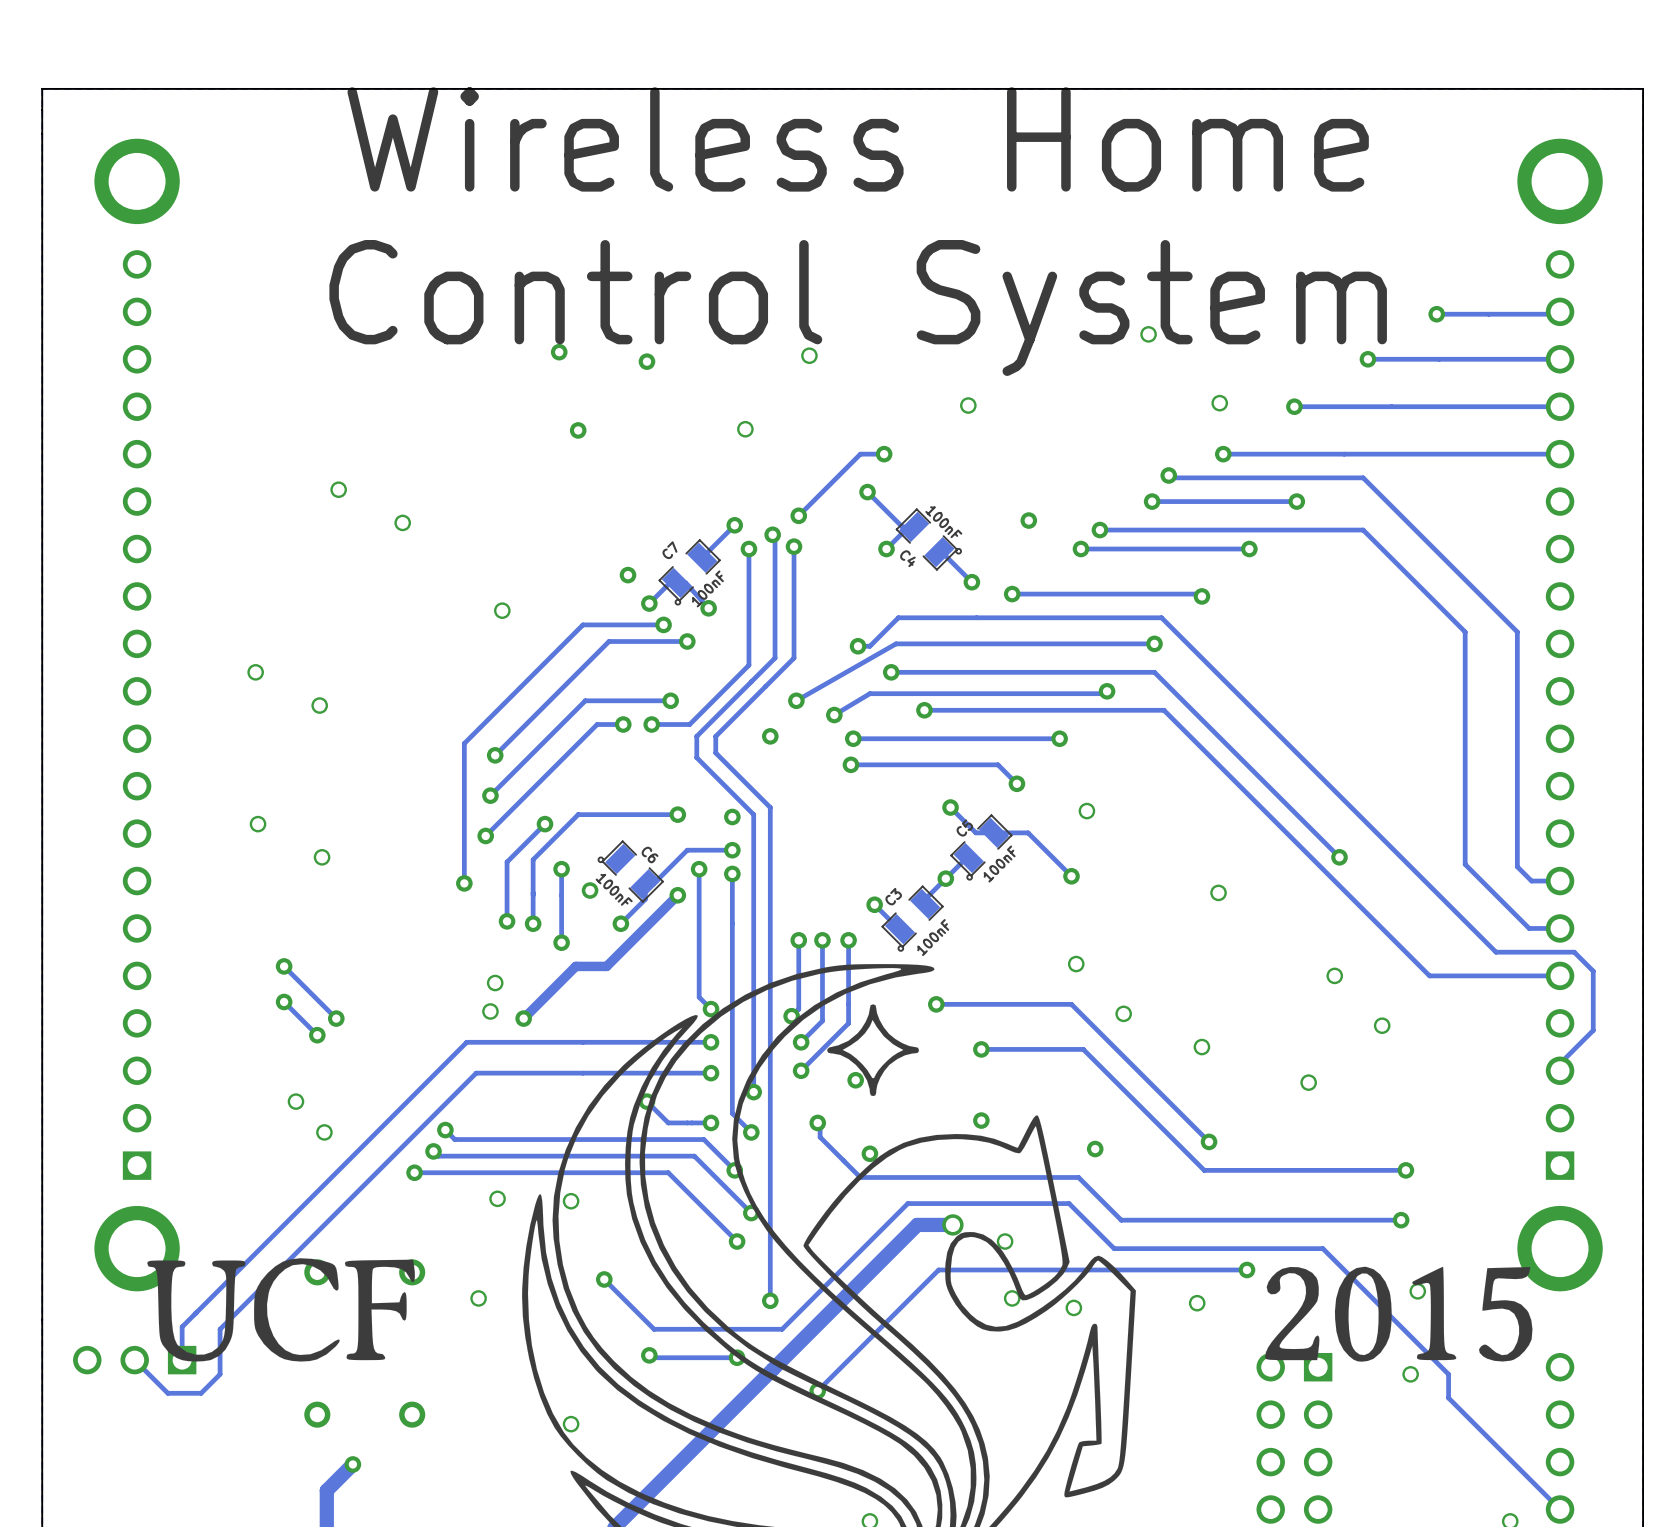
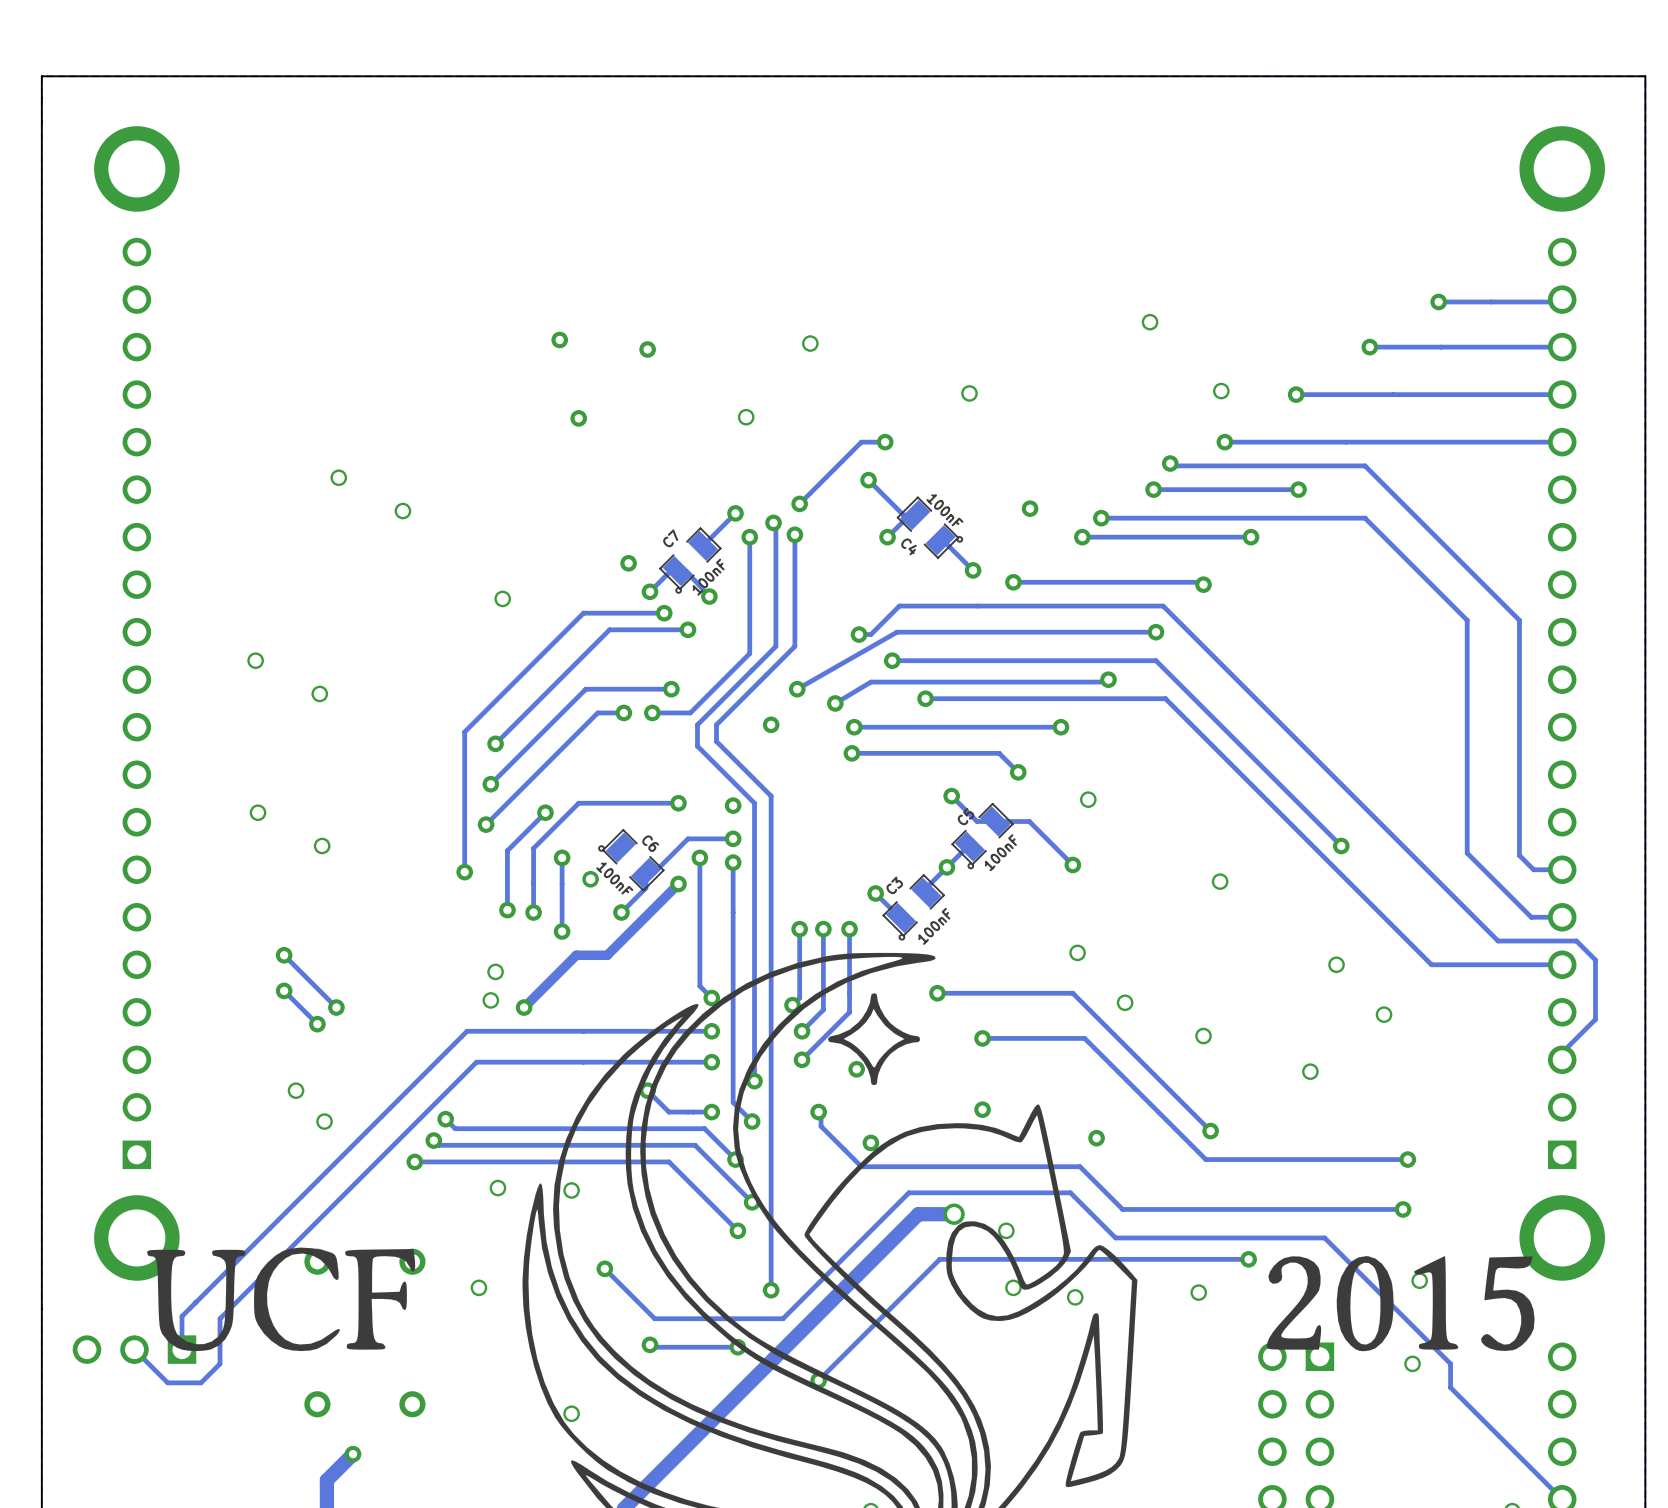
text: Wireless Home (858, 139) -> none
text: Control System (858, 307) -> none

